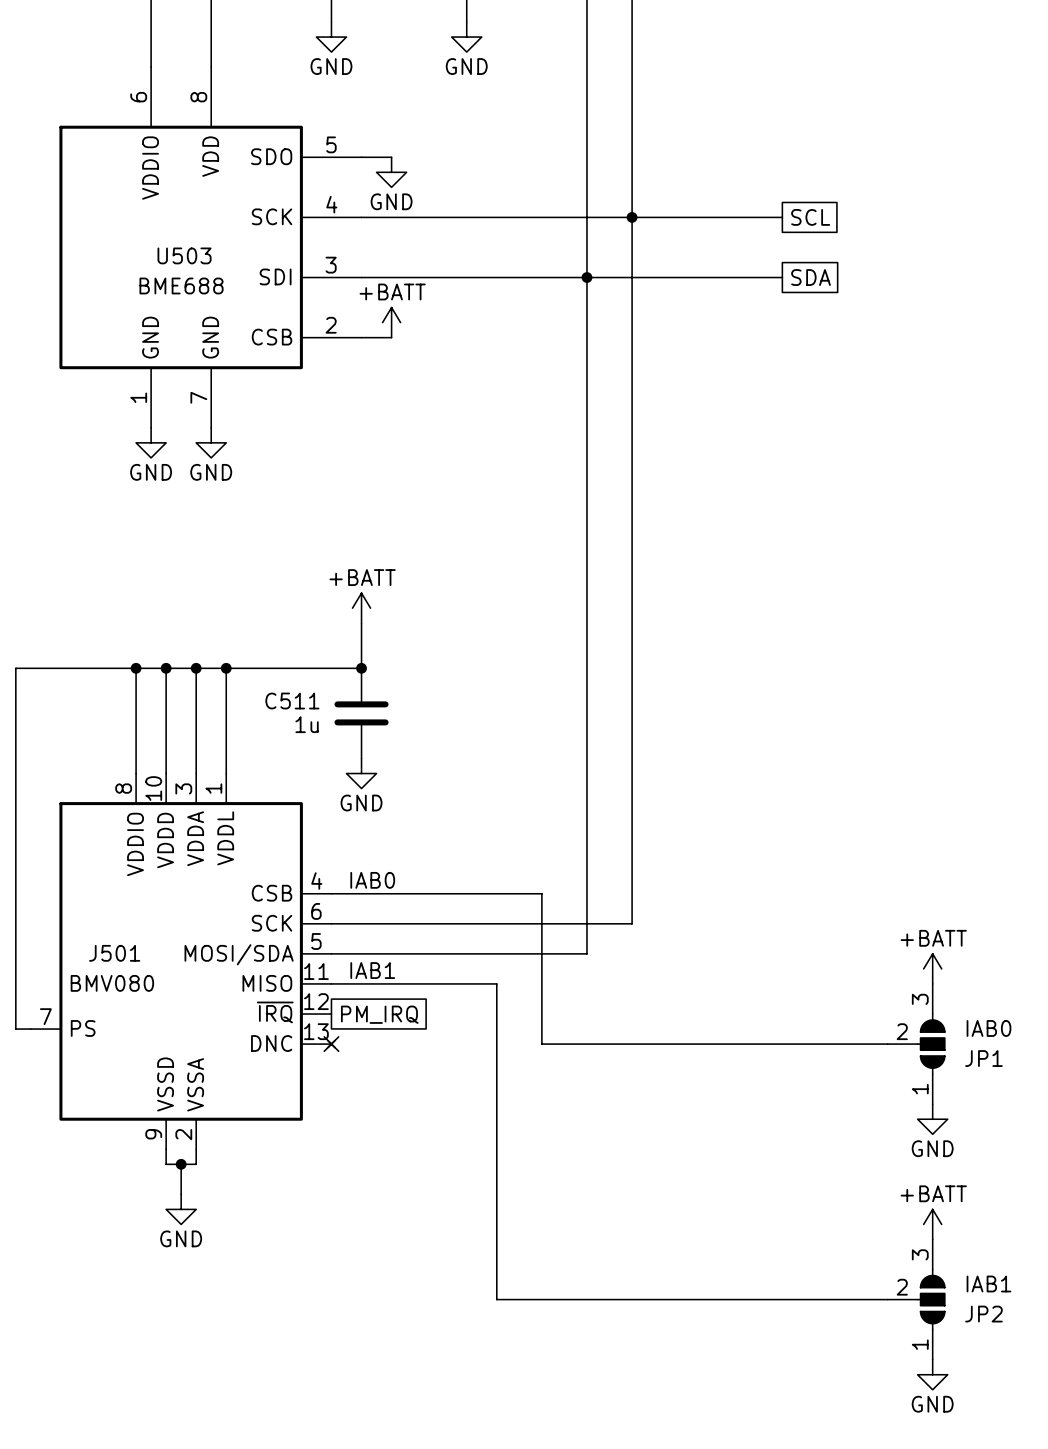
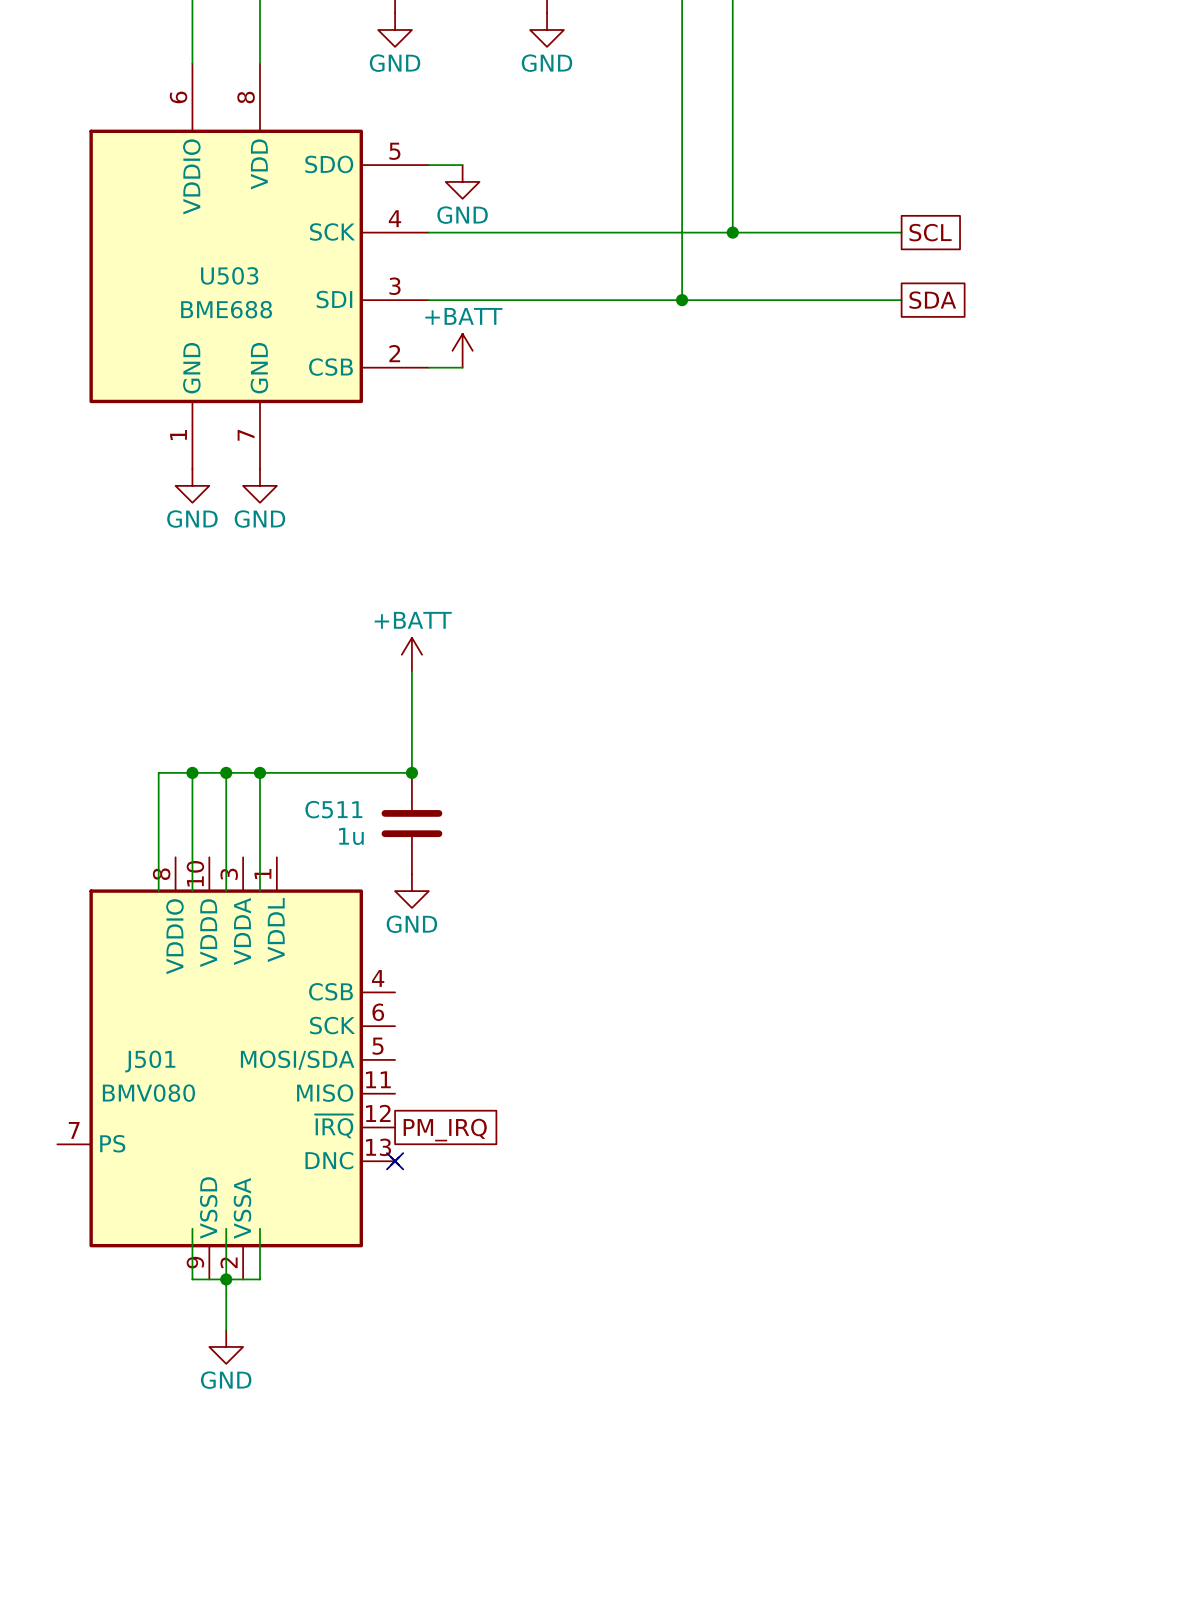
wire: (632, 217) (632, 923) (331, 923) -> none
wire: (586, 277) (586, 953) (331, 953) -> none
wire: none -> (411, 671) (411, 772) (158, 772) (158, 891)
power symbol position: +BATT (361, 608) -> +BATT (411, 654)
wire: (361, 623) (361, 668) (15, 668) (15, 1029) (30, 1029) -> none
wire: (136, 668) (136, 773) -> (192, 772) (192, 891)
junction: (136, 668) -> none
wire: (166, 668) (166, 773) -> (226, 772) (226, 891)
junction: (166, 668) -> none
wire: (196, 668) (196, 773) -> none
junction: (196, 668) -> none
wire: (226, 668) (226, 773) -> (259, 772) (259, 891)
junction: (226, 668) -> none
junction position: (361, 668) -> (411, 772)
junction: none -> (192, 772)
junction: none -> (226, 772)
junction: none -> (259, 772)
C511 position: (361, 713) -> (411, 823)
power symbol position: GND (361, 773) -> GND (411, 891)
label: IAB0 (372, 880) -> none
wire: (331, 893) (541, 893) (541, 1044) (887, 1044) -> none
power symbol: +BATT (932, 968) -> none
label: IAB1 (372, 970) -> none
wire: (331, 983) (496, 983) (496, 1299) (887, 1299) -> none
JP1: IAB0 (916, 1044) -> none
wire: none -> (192, 1228) (192, 1279) (259, 1279) (259, 1228)
wire: none -> (226, 1228) (226, 1296)
power symbol: GND (932, 1119) -> none
wire: (166, 1149) (166, 1164) (196, 1164) (196, 1149) -> none
junction position: (181, 1164) -> (226, 1279)
power symbol: +BATT (932, 1224) -> none
JP2: IAB1 (916, 1299) -> none
power symbol: GND (932, 1374) -> none

